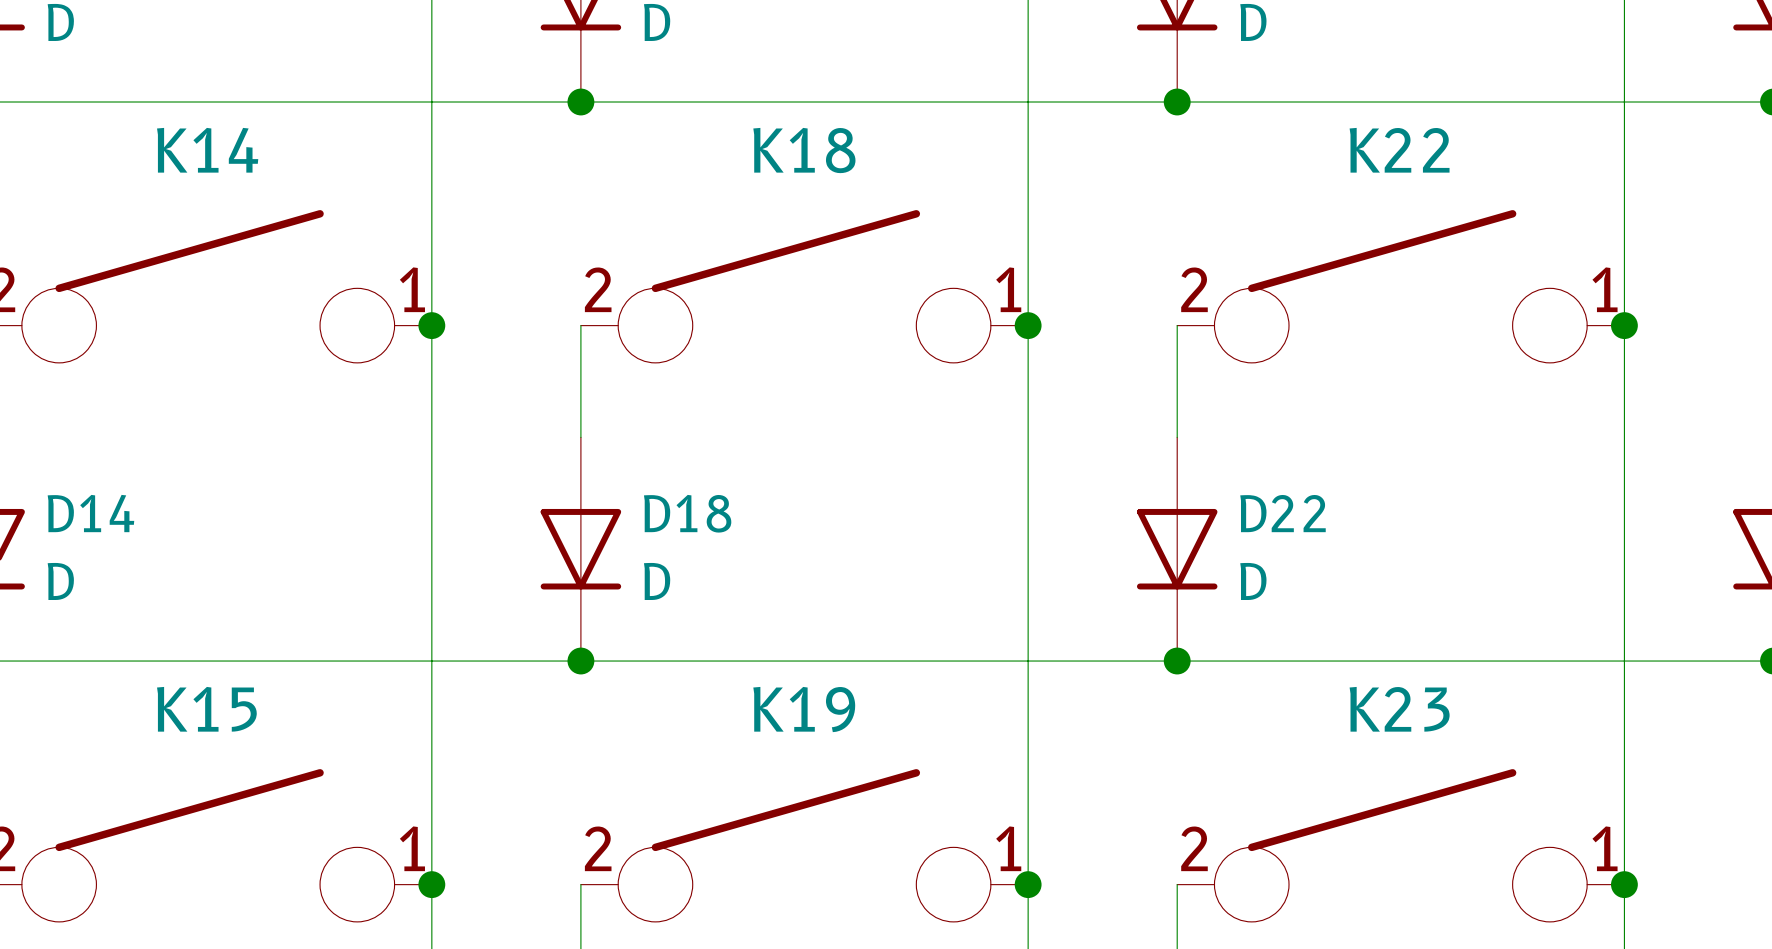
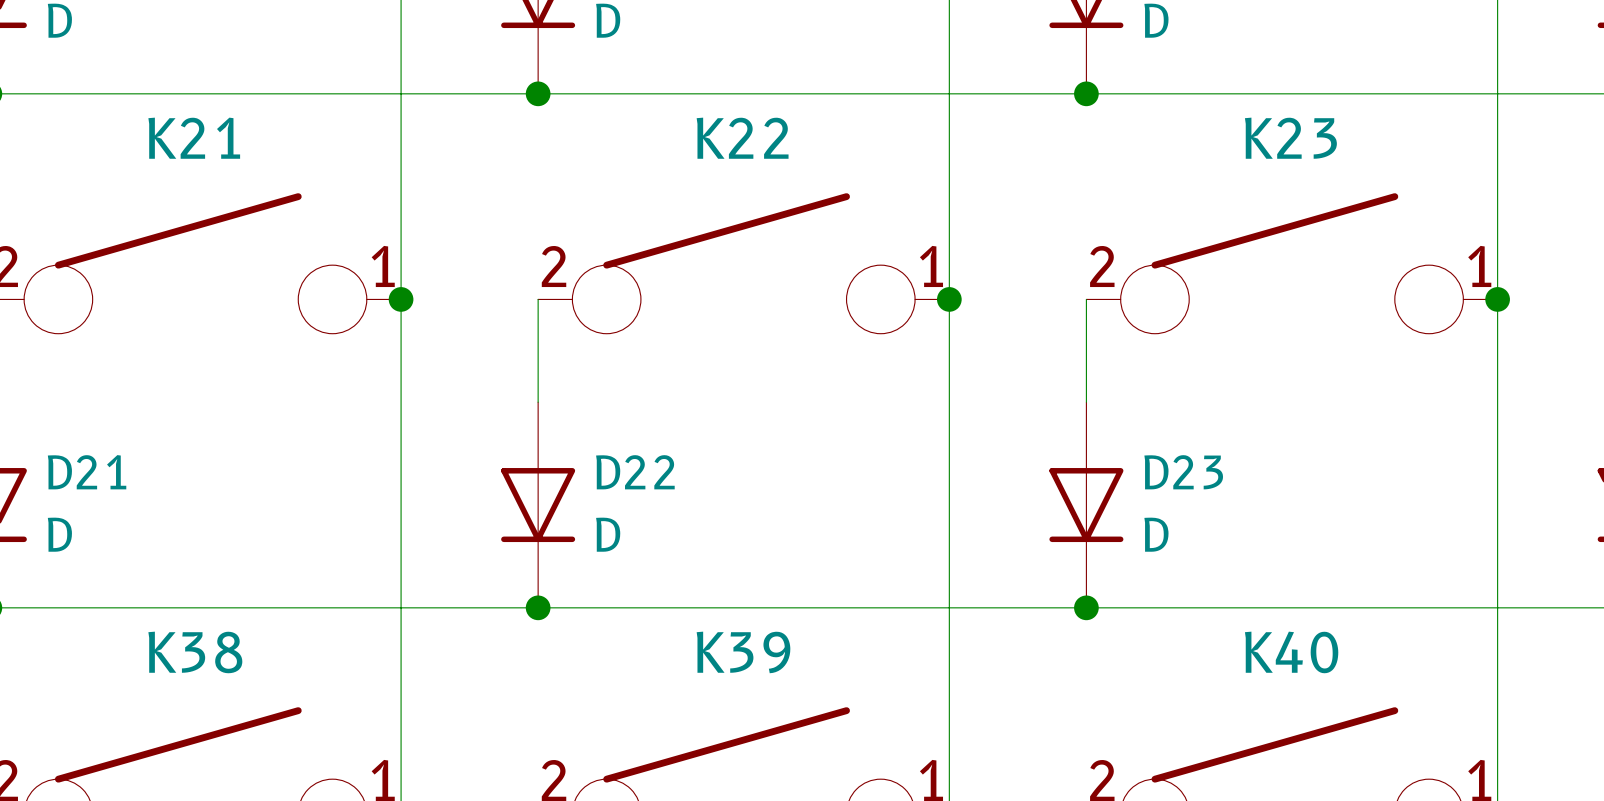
K14 name: K14 (207, 150) -> K21 (194, 138)
K18 name: K18 (804, 150) -> K22 (742, 138)
K22 name: K22 (1399, 150) -> K23 (1290, 138)
D14 name: D14 (90, 513) -> D21 (87, 472)
D18 name: D18 (687, 513) -> D22 (635, 472)
D22 name: D22 (1282, 513) -> D23 (1183, 472)
K15 name: K15 (206, 709) -> K38 (195, 652)
K19 name: K19 (804, 709) -> K39 (743, 652)
K23 name: K23 (1399, 709) -> K40 (1291, 652)

